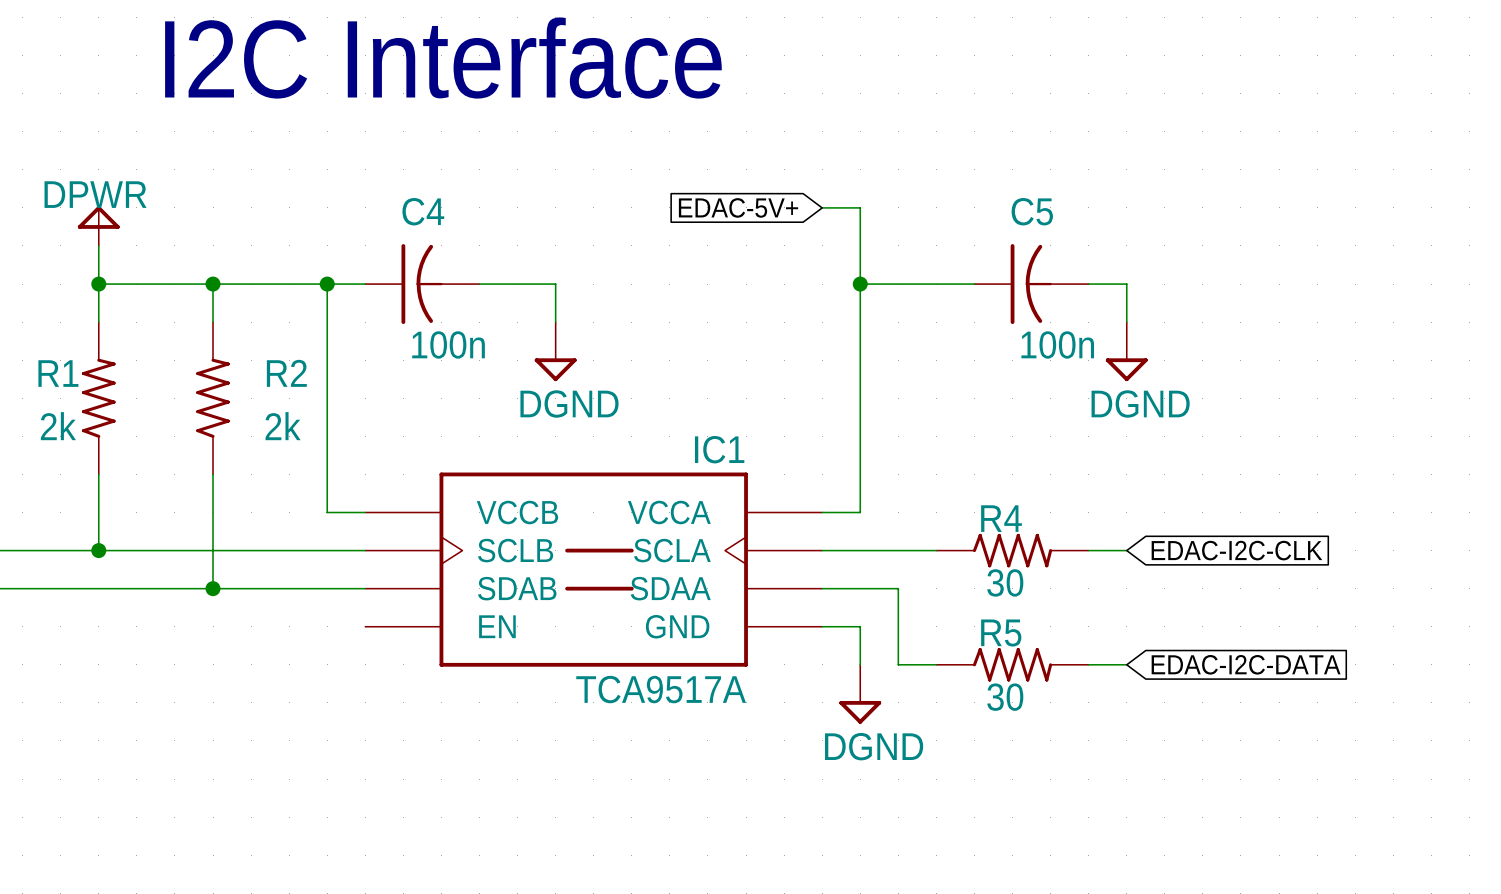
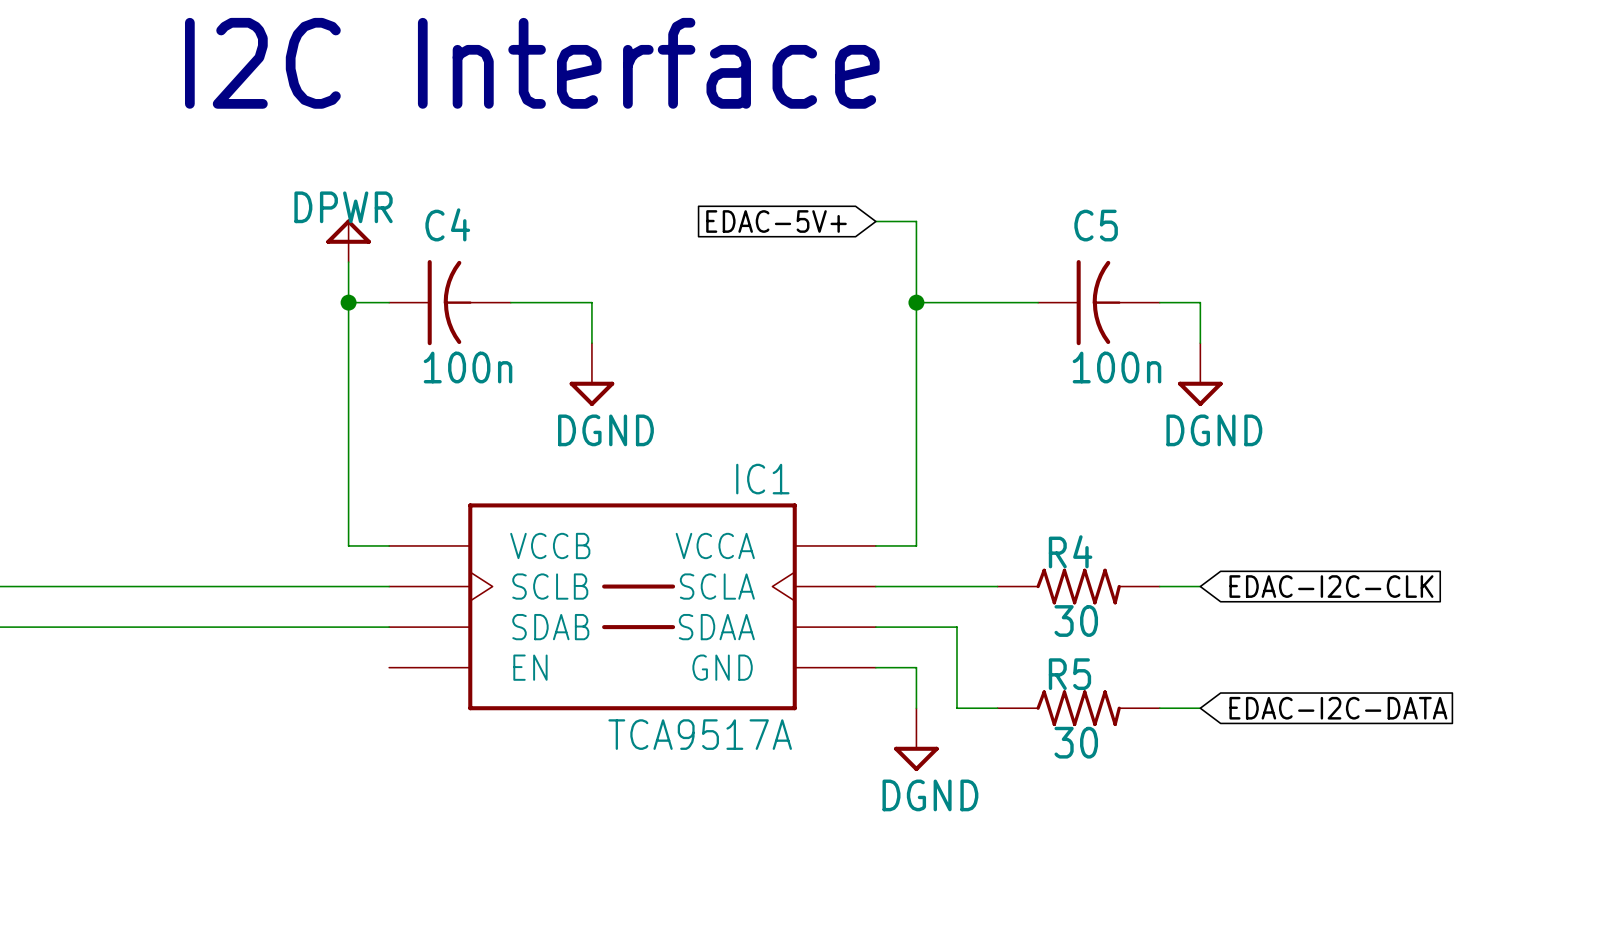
power symbol position: DPWR (98, 226) -> DPWR (348, 240)
wire: (98, 245) (98, 322) -> none
wire: (98, 284) (327, 284) -> (348, 262) (348, 302)
junction: (98, 284) -> none
wire: (213, 284) (213, 322) -> none
junction: (213, 284) -> none
R1: 2k (98, 398) -> none
R2: 2k (213, 398) -> none
wire: (98, 474) (98, 550) -> none
wire: (213, 474) (213, 588) -> none
junction: (98, 550) -> none
junction: (213, 588) -> none

